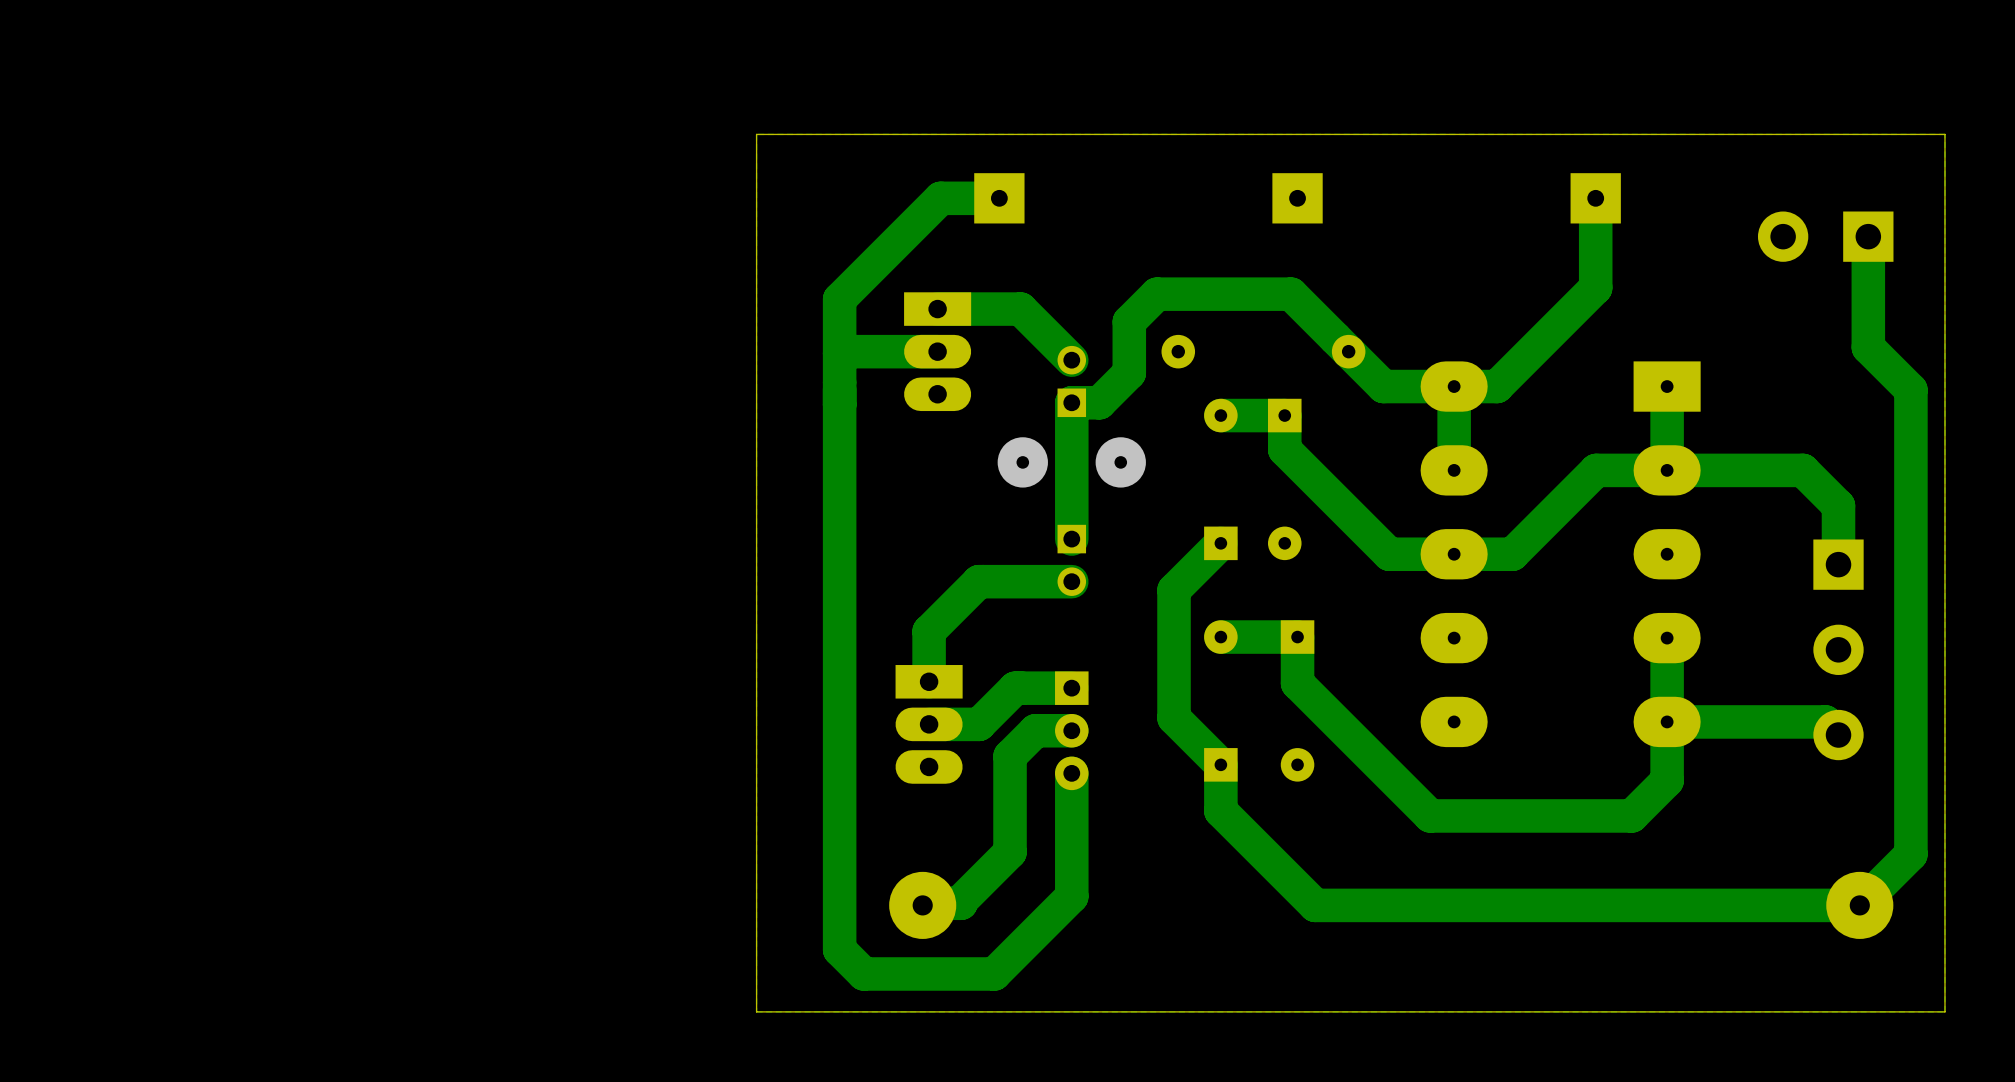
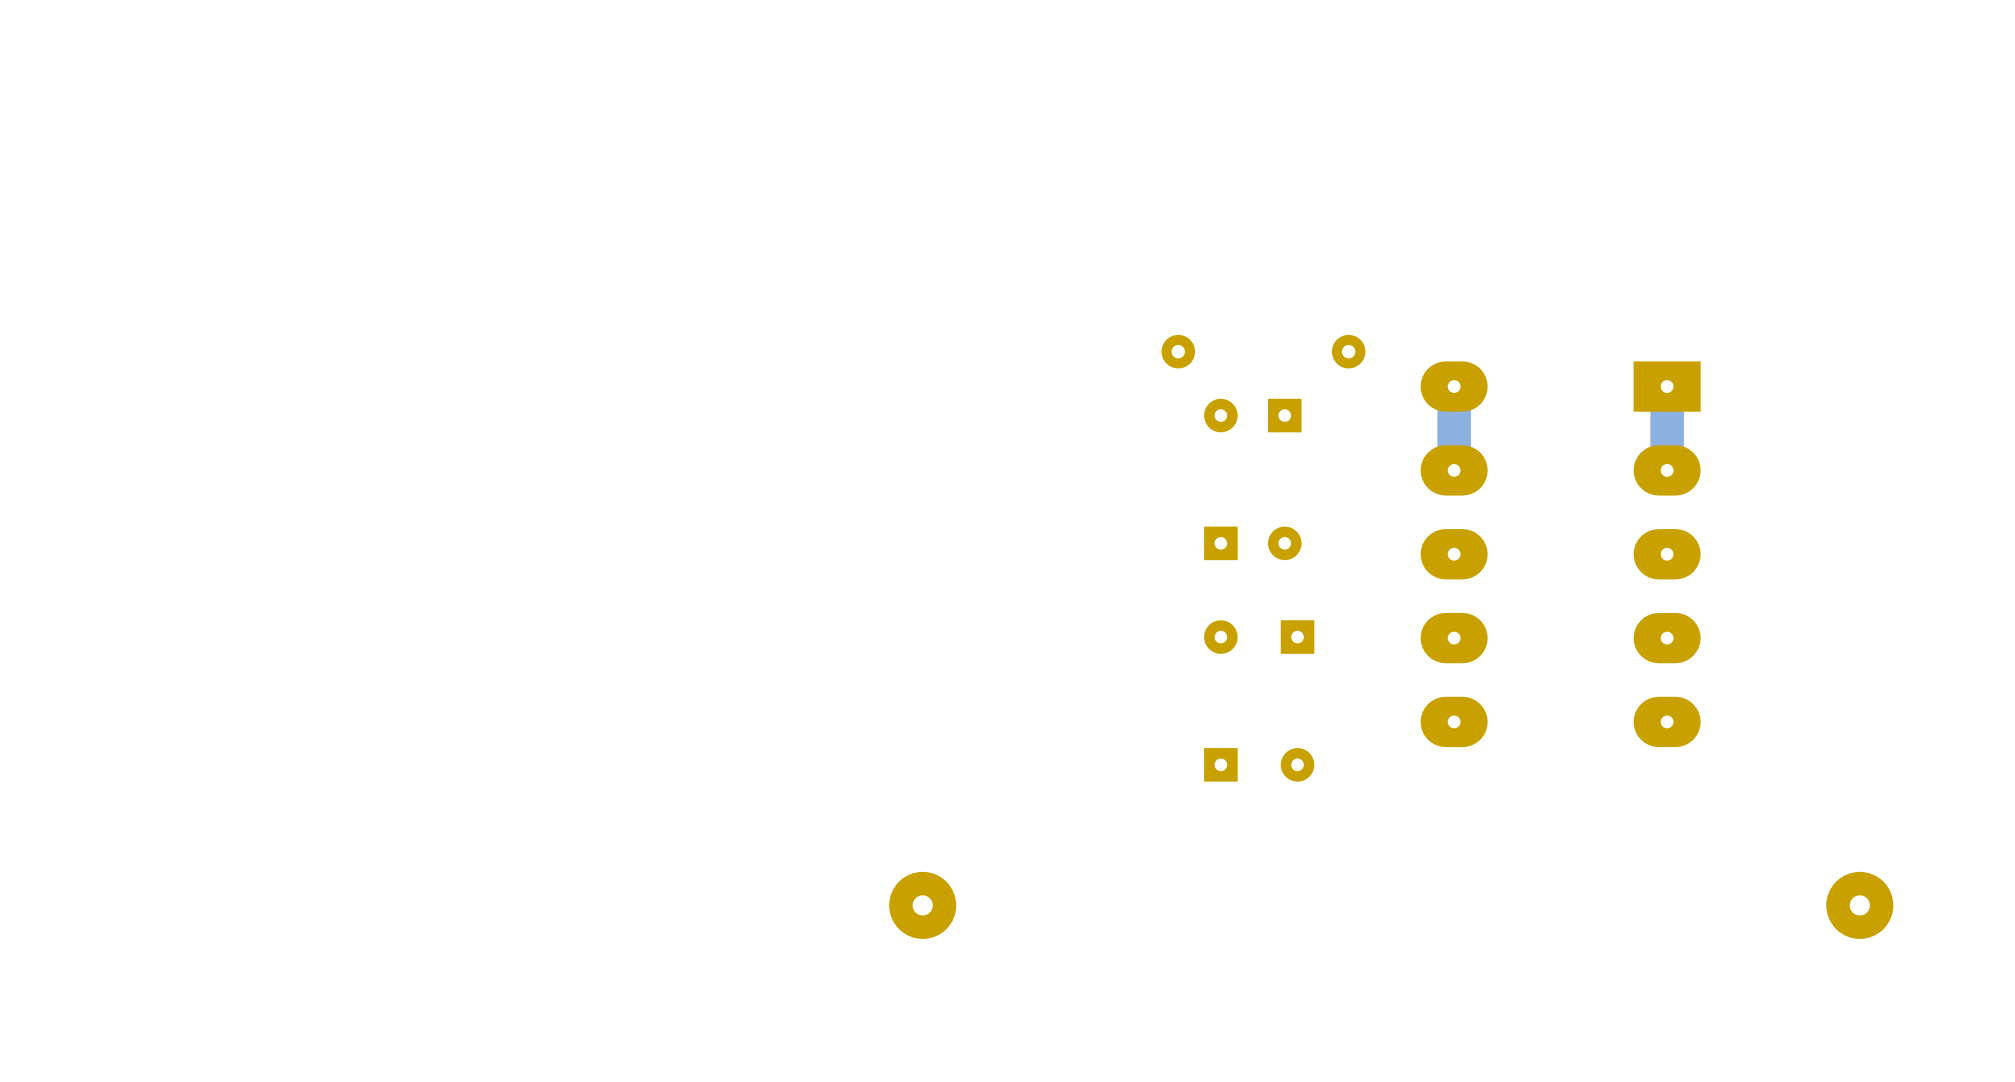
board edge: (1944, 134) (1944, 1011) (756, 1011) (756, 134) (1944, 134) -> none
track: (999, 198) (940, 198) (839, 299) (839, 949) (863, 973) (994, 973) (1071, 896) (1071, 773) -> none
part: (999, 198) -> none
part: (1297, 198) -> none
track: (1595, 198) (1595, 287) (1496, 386) (1383, 386) (1291, 294) (1156, 294) (1129, 321) (1129, 372) (1099, 402) (1071, 402) (1071, 539) -> none
part: (1595, 198) -> none
part: (1825, 236) -> none
track: (1868, 236) (1868, 347) (1910, 390) (1910, 854) (1859, 905) -> none
track: (937, 309) (1020, 309) (1071, 360) -> none
track: (937, 351) (841, 351) (839, 353) -> none
part: (937, 351) -> none
part: (1071, 381) -> none
track: (1220, 415) (1284, 415) (1284, 449) (1389, 554) (1512, 554) (1596, 470) (1802, 470) (1838, 505) (1838, 564) -> none
via: (1022, 462) -> none
via: (1120, 462) -> none
track: (1220, 543) (1174, 590) (1174, 717) (1220, 764) (1220, 810) (1315, 905) (1852, 905) -> none
part: (1071, 560) -> none
track: (1071, 581) (978, 581) (929, 631) (929, 681) -> none
track: (1220, 637) (1297, 637) (1297, 683) (1430, 815) (1631, 815) (1667, 780) (1667, 638) -> none
part: (1838, 649) -> none
track: (1071, 688) (1015, 688) (979, 724) (929, 724) -> none
track: (1667, 721) (1825, 721) (1838, 735) -> none
part: (929, 724) -> none
track: (1071, 730) (1035, 730) (1010, 756) (1010, 852) (961, 903) (924, 903) (922, 905) -> none
part: (1071, 730) -> none

